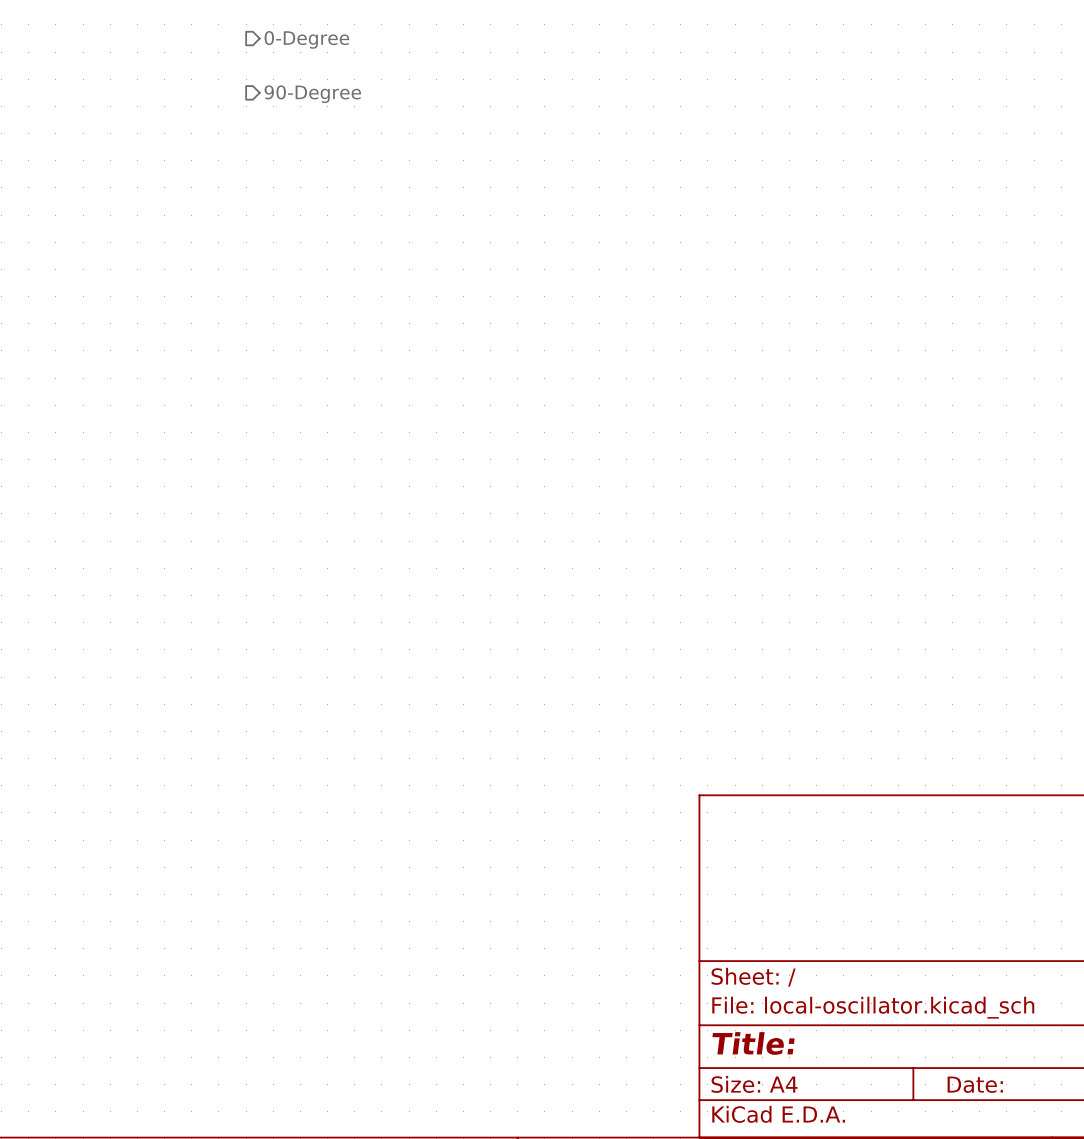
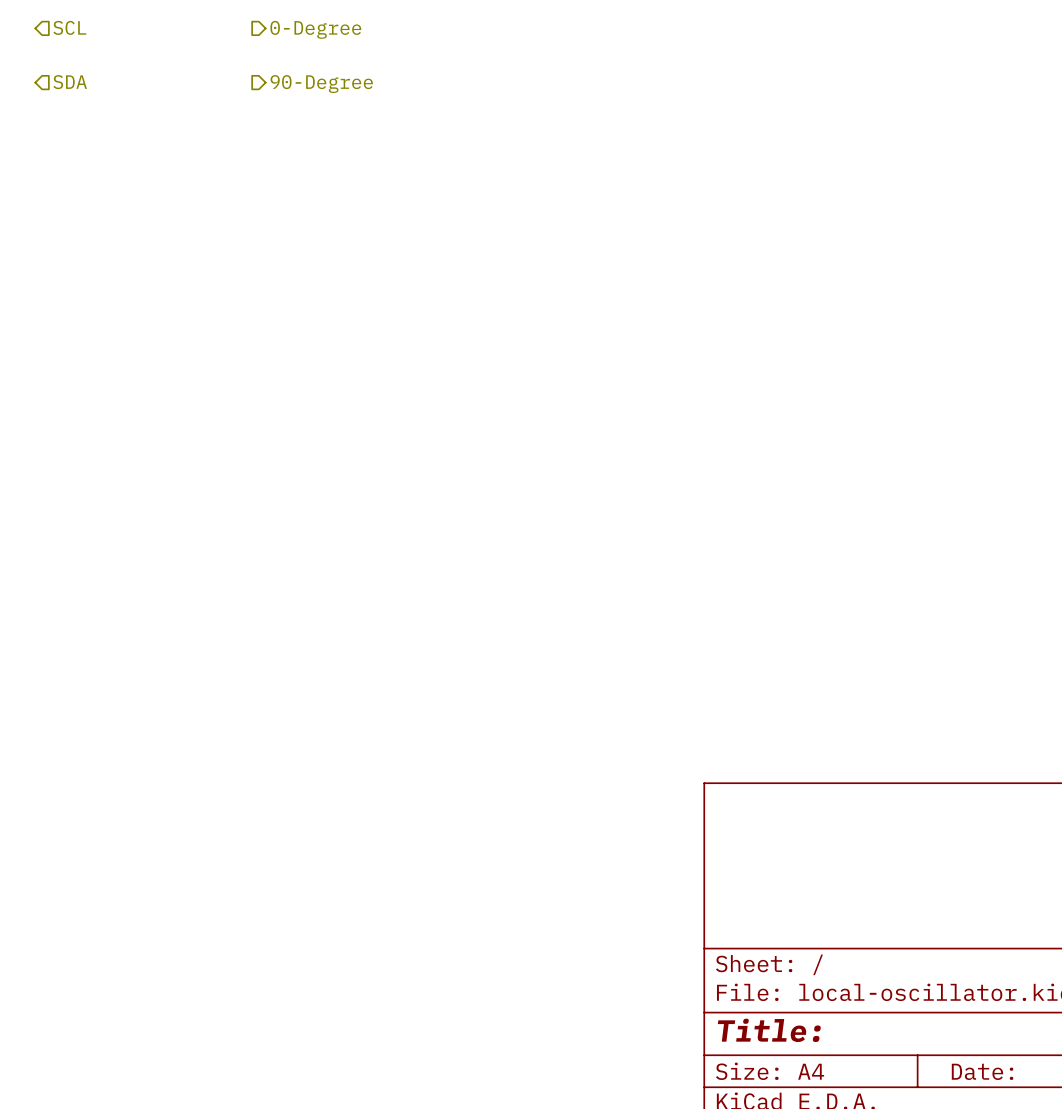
hierarchical label: none -> SCL (69, 27)
hierarchical label: none -> SDA (70, 82)

